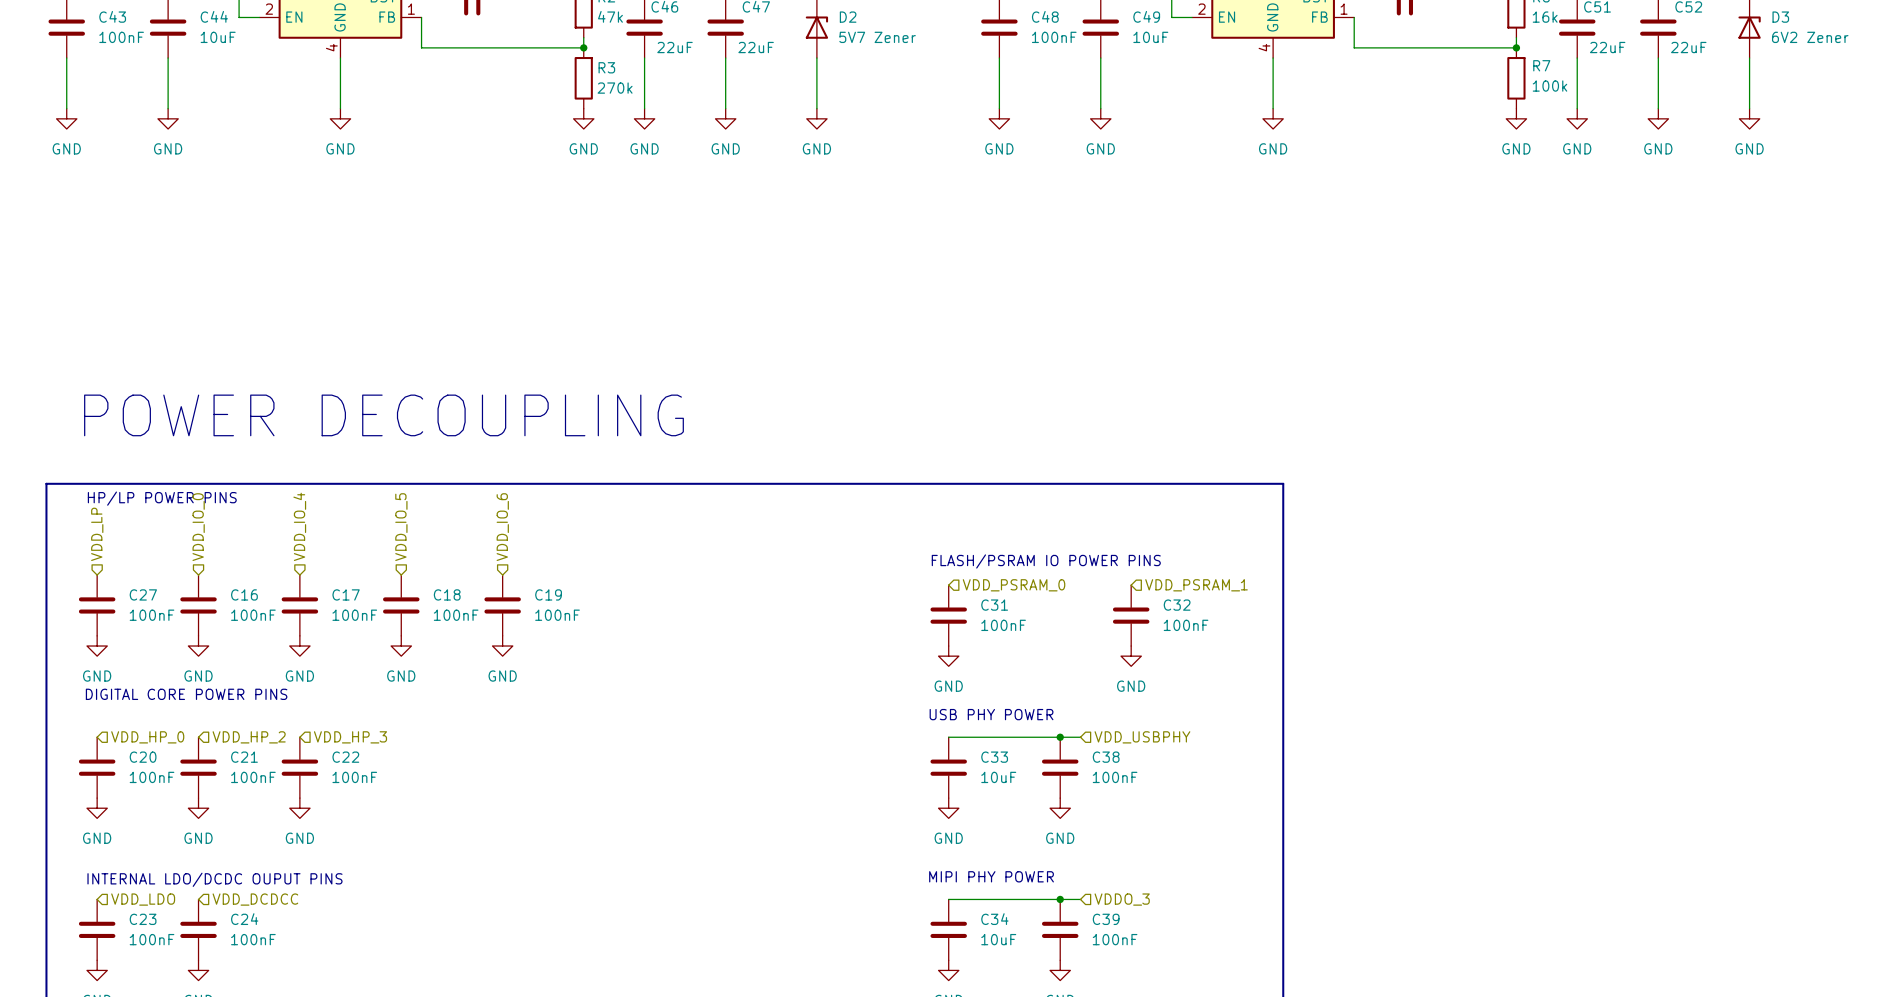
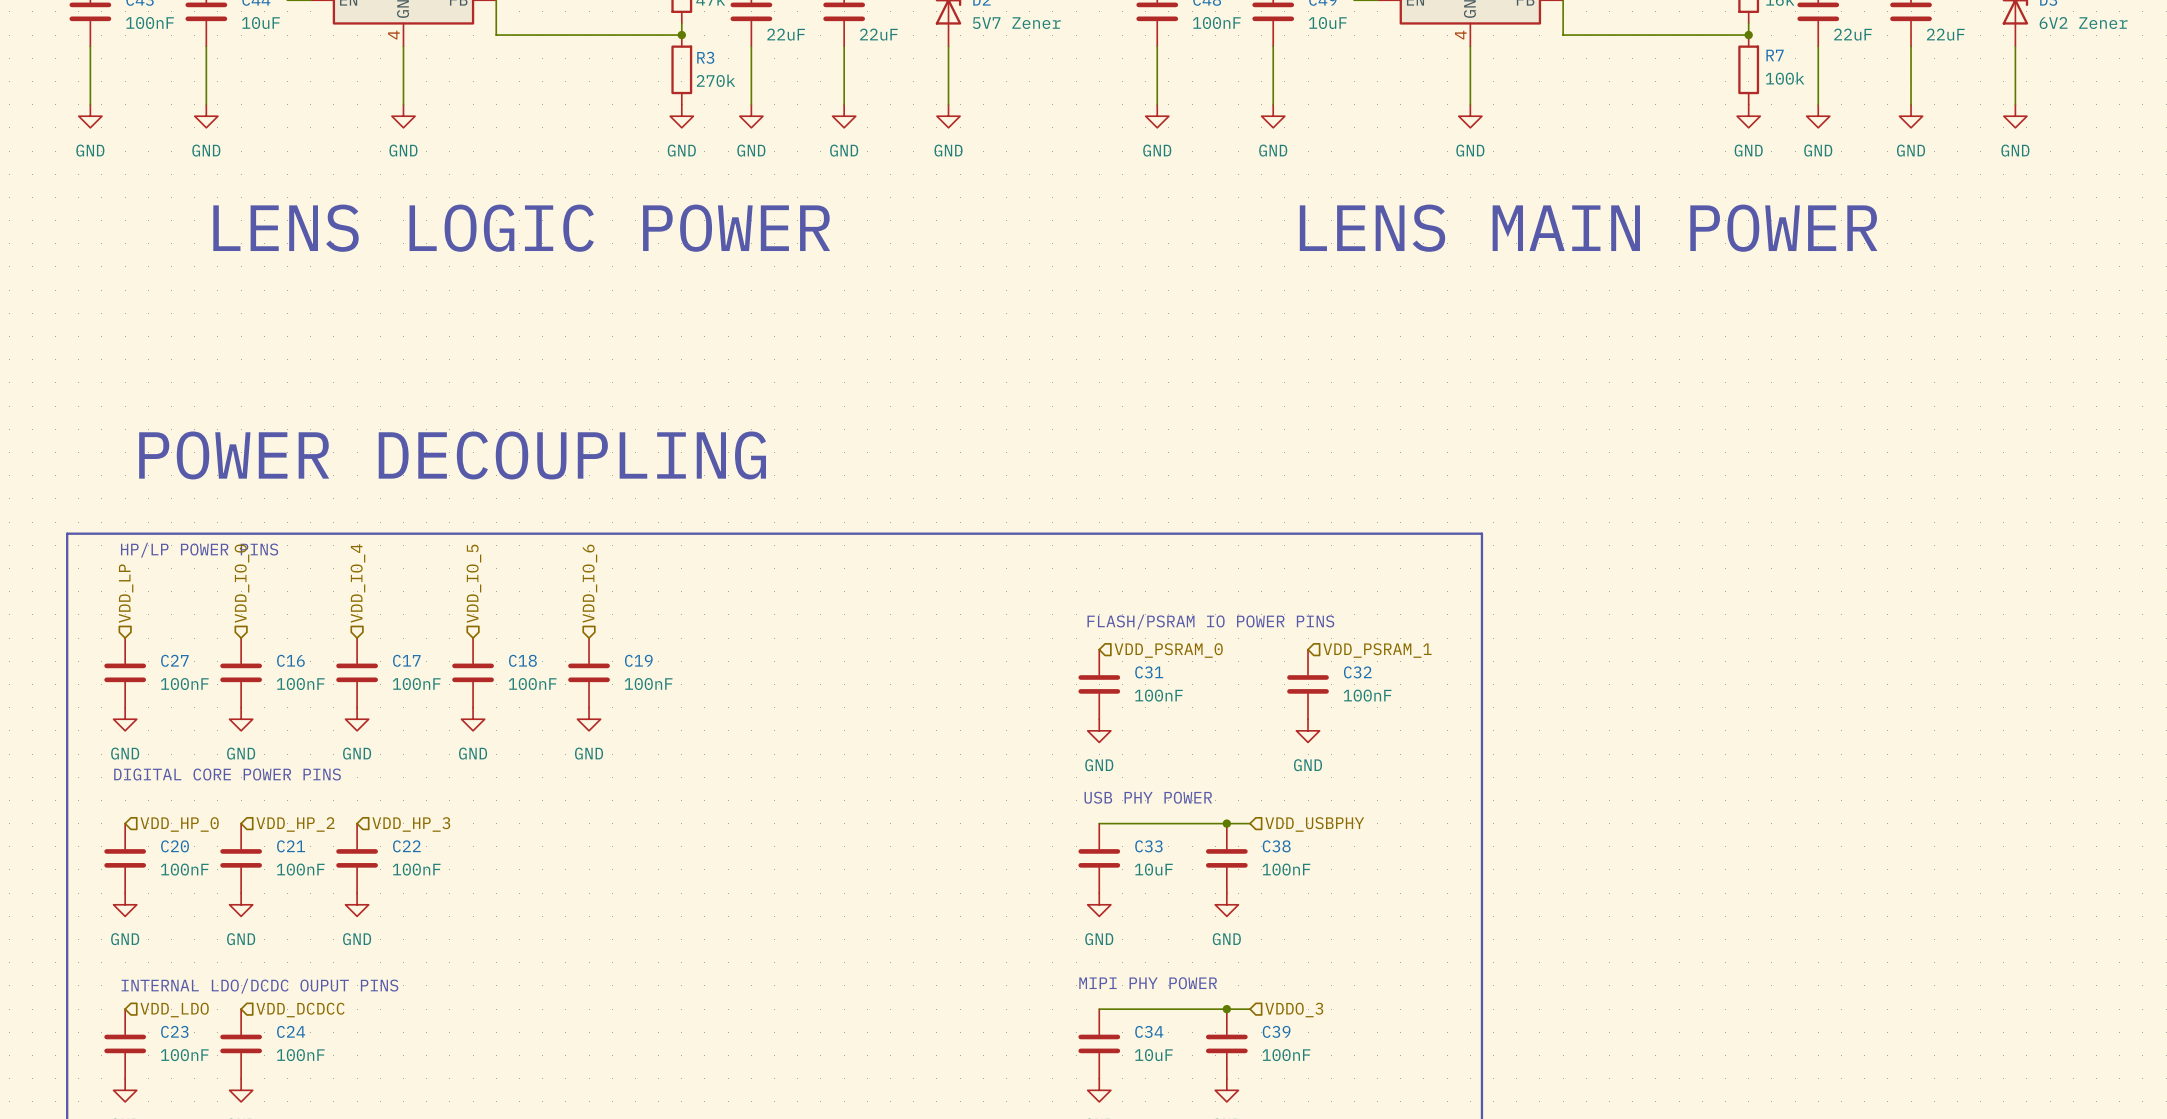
text: none -> LENS LOGIC POWER (521, 228)
text: none -> LENS MAIN POWER (1588, 228)

